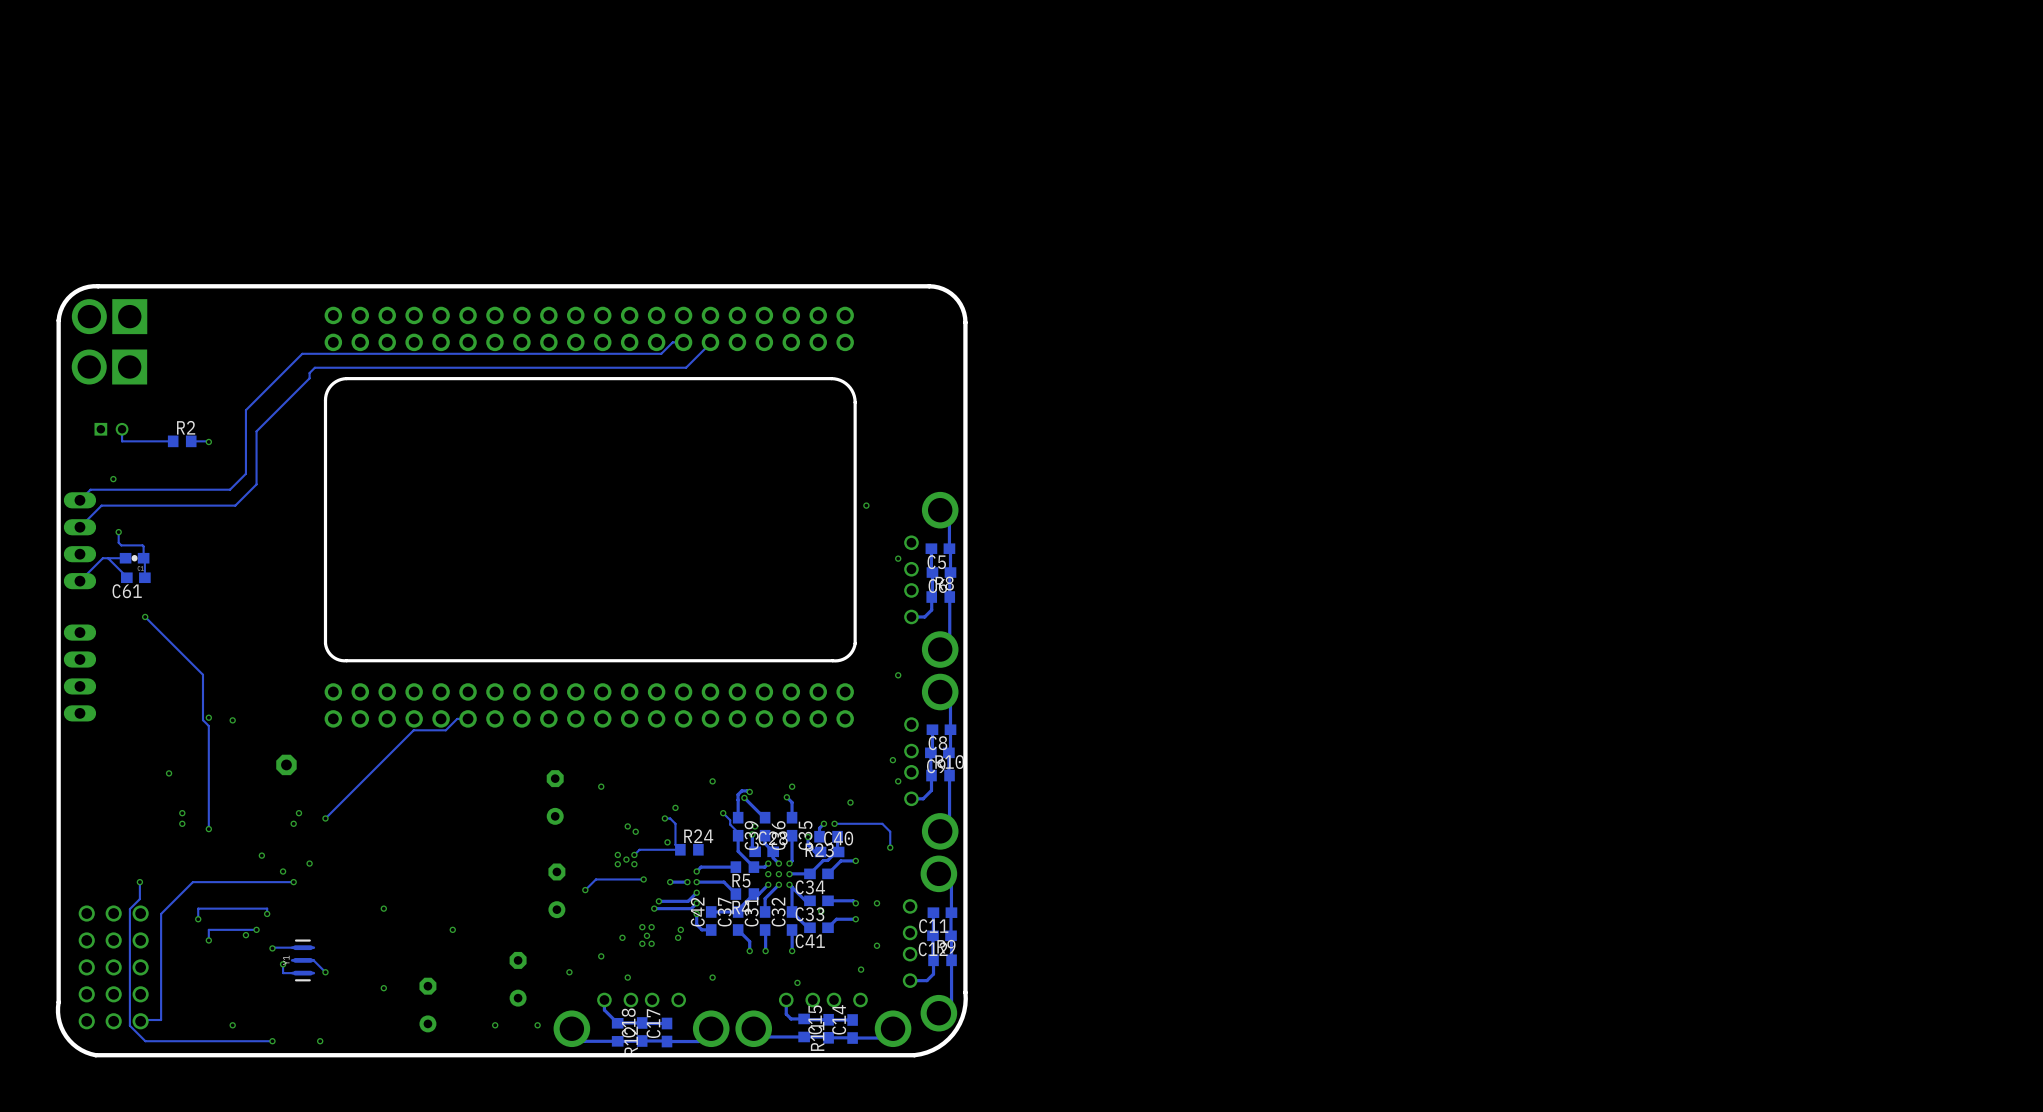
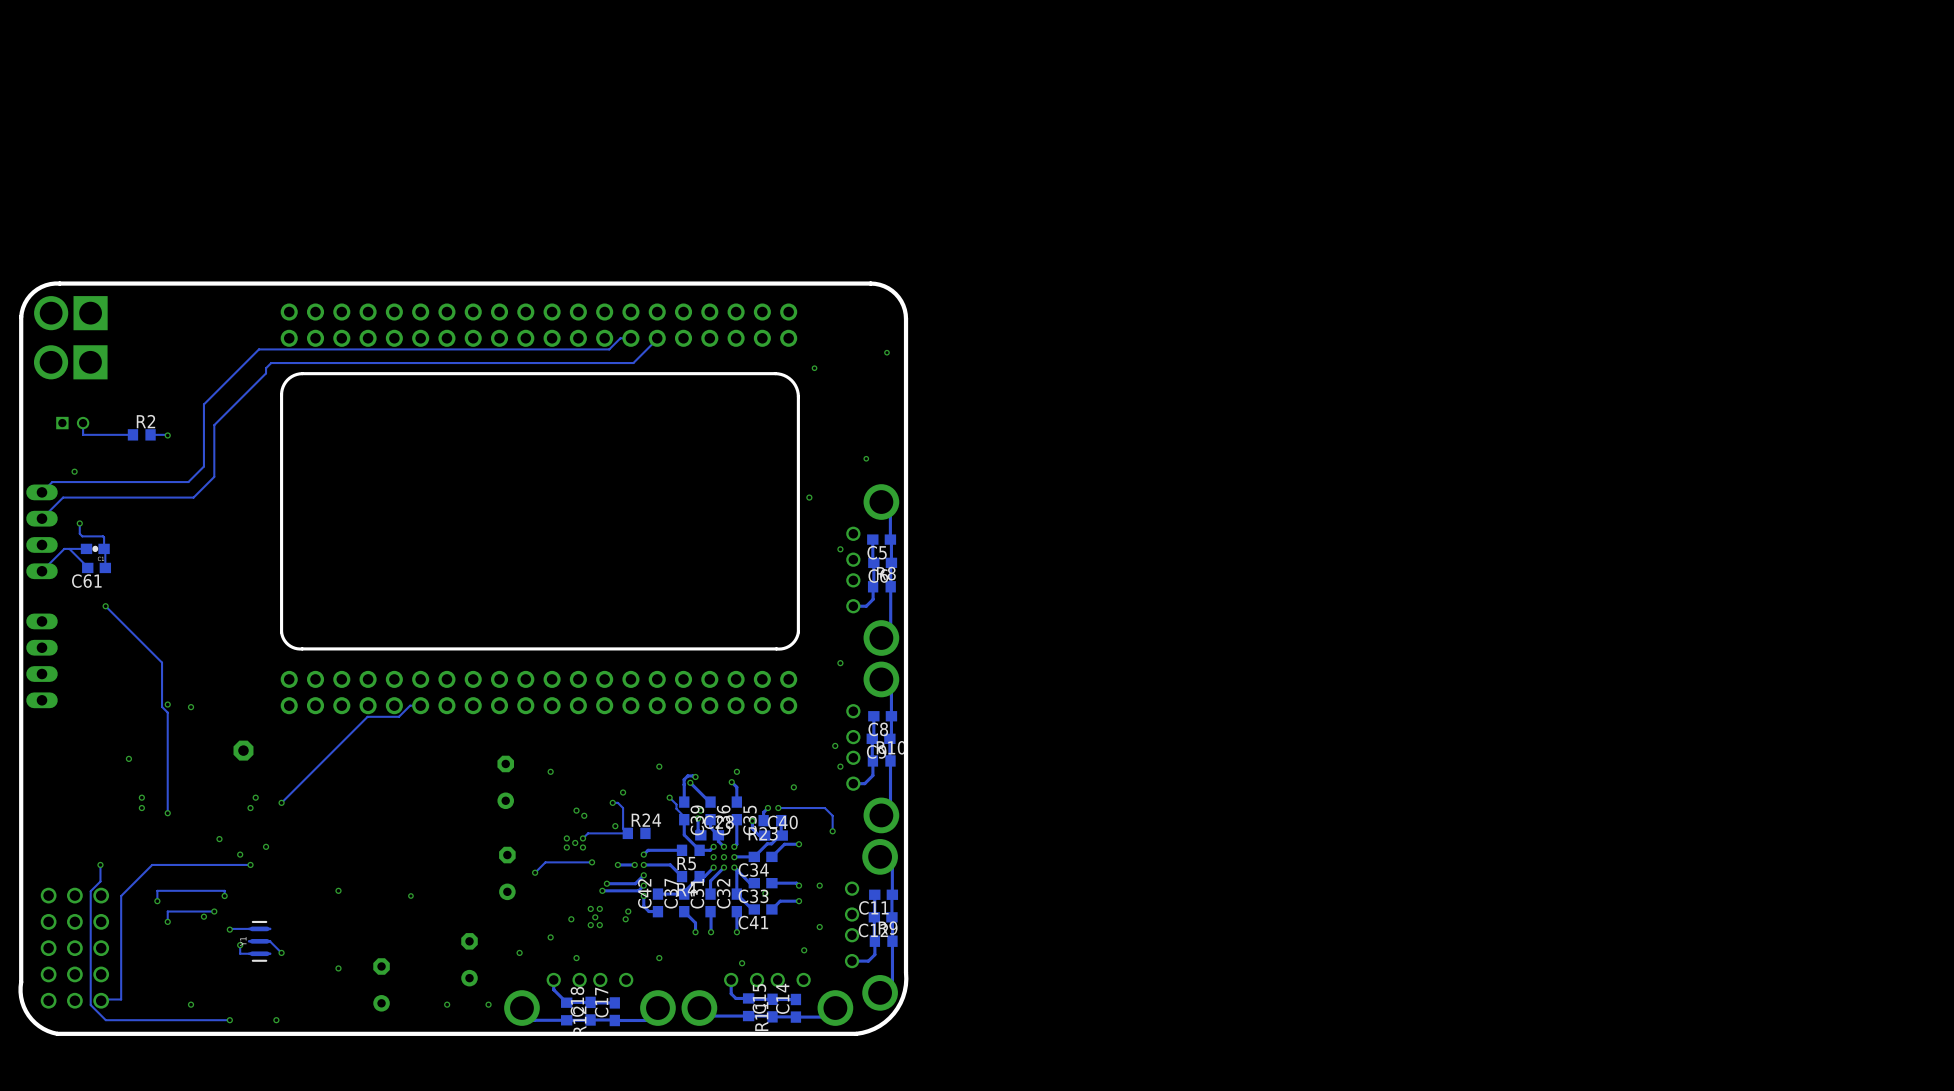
via: none -> (886, 352)
via: none -> (814, 368)
via: none -> (866, 458)
via: none -> (410, 896)
via: (452, 929) -> none

